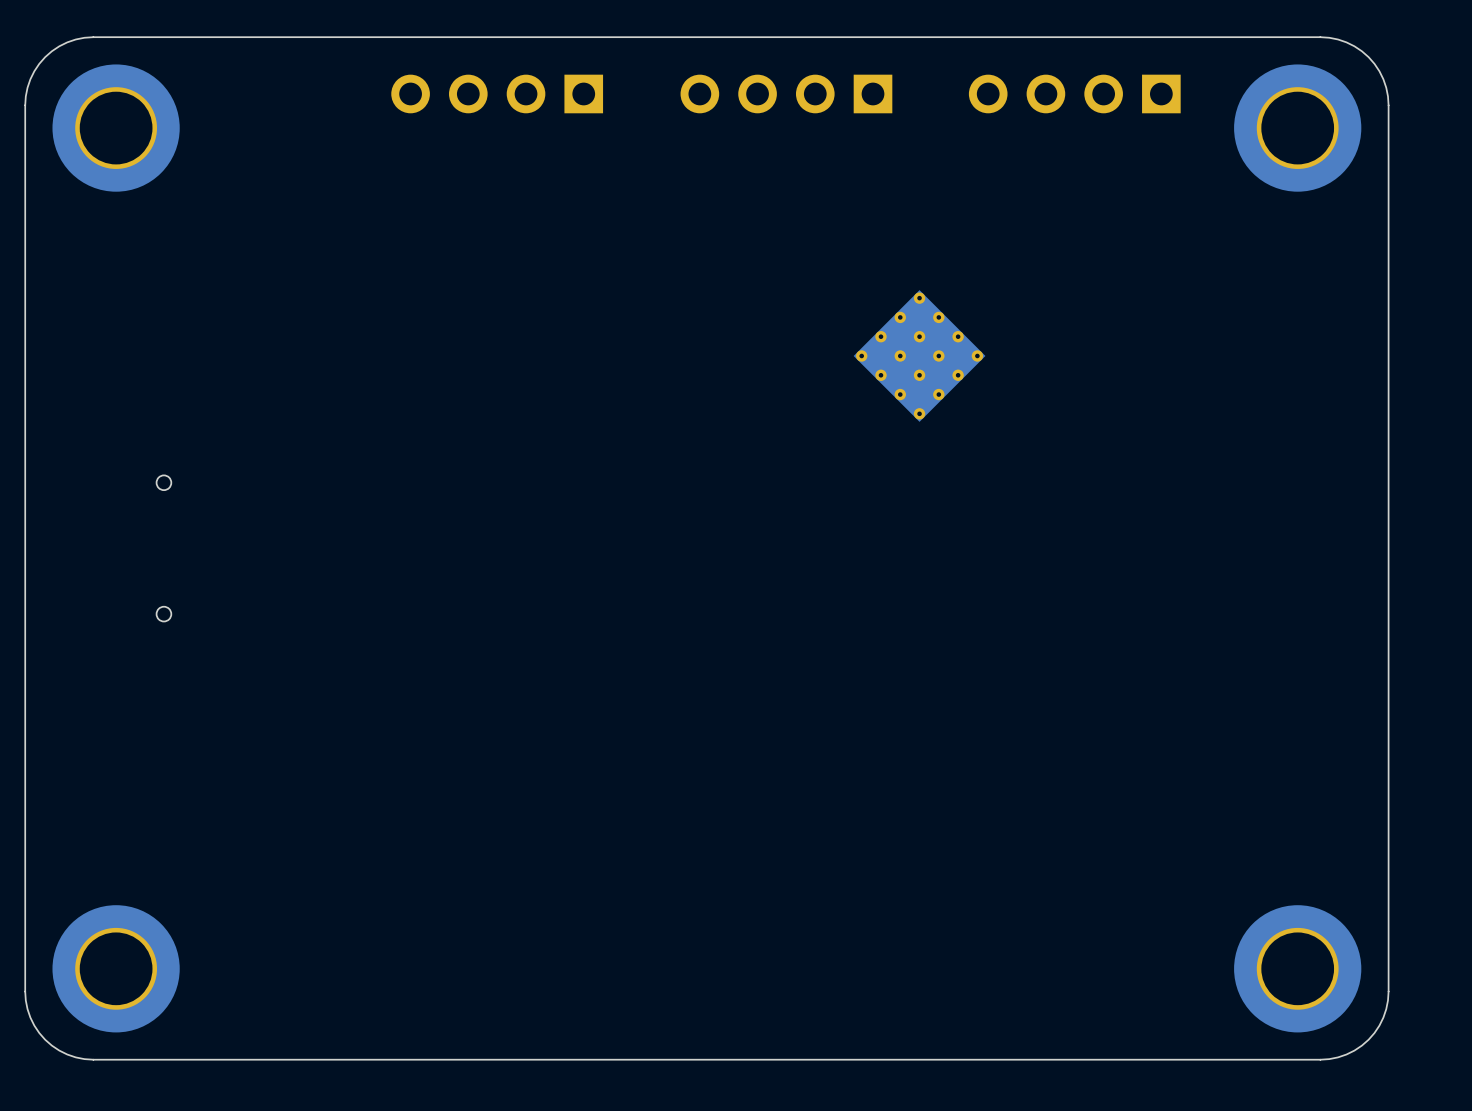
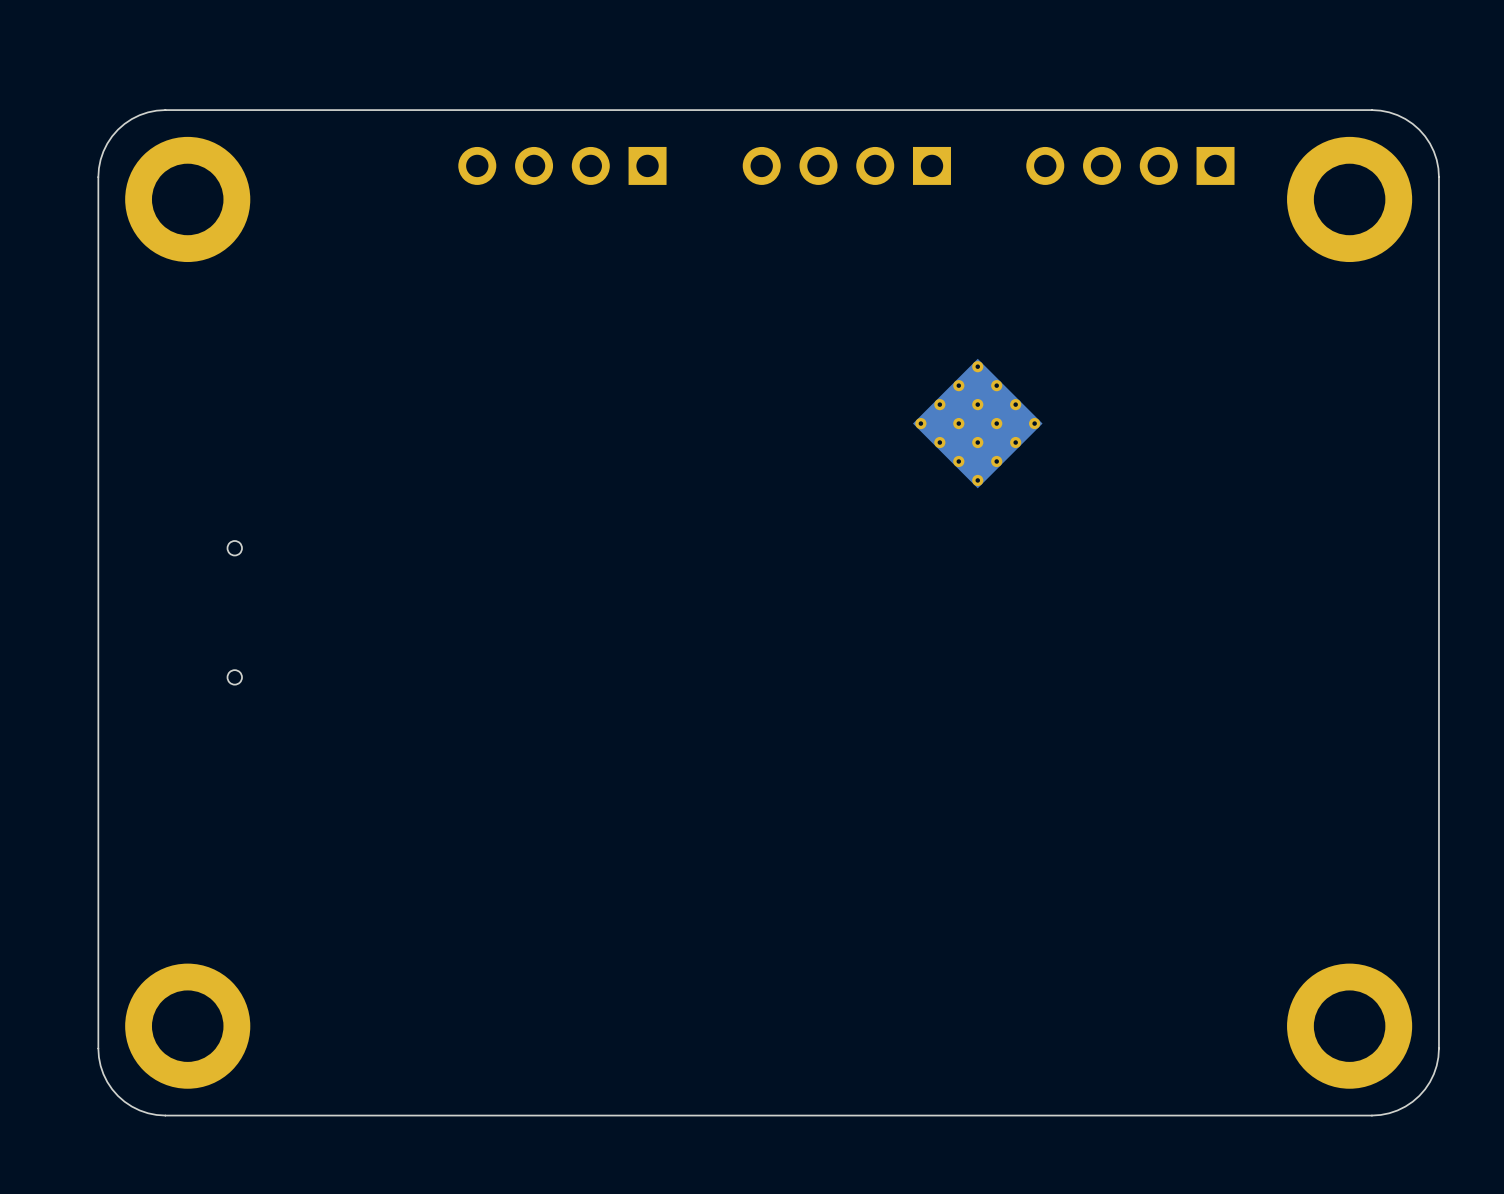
part footprint: [52, 64, 180, 192] -> [125, 136, 251, 263]
part footprint: [1234, 64, 1362, 192] -> [1287, 136, 1413, 263]
part footprint: [52, 905, 180, 1033] -> [125, 963, 251, 1089]
part footprint: [1234, 905, 1362, 1033] -> [1287, 963, 1413, 1089]

